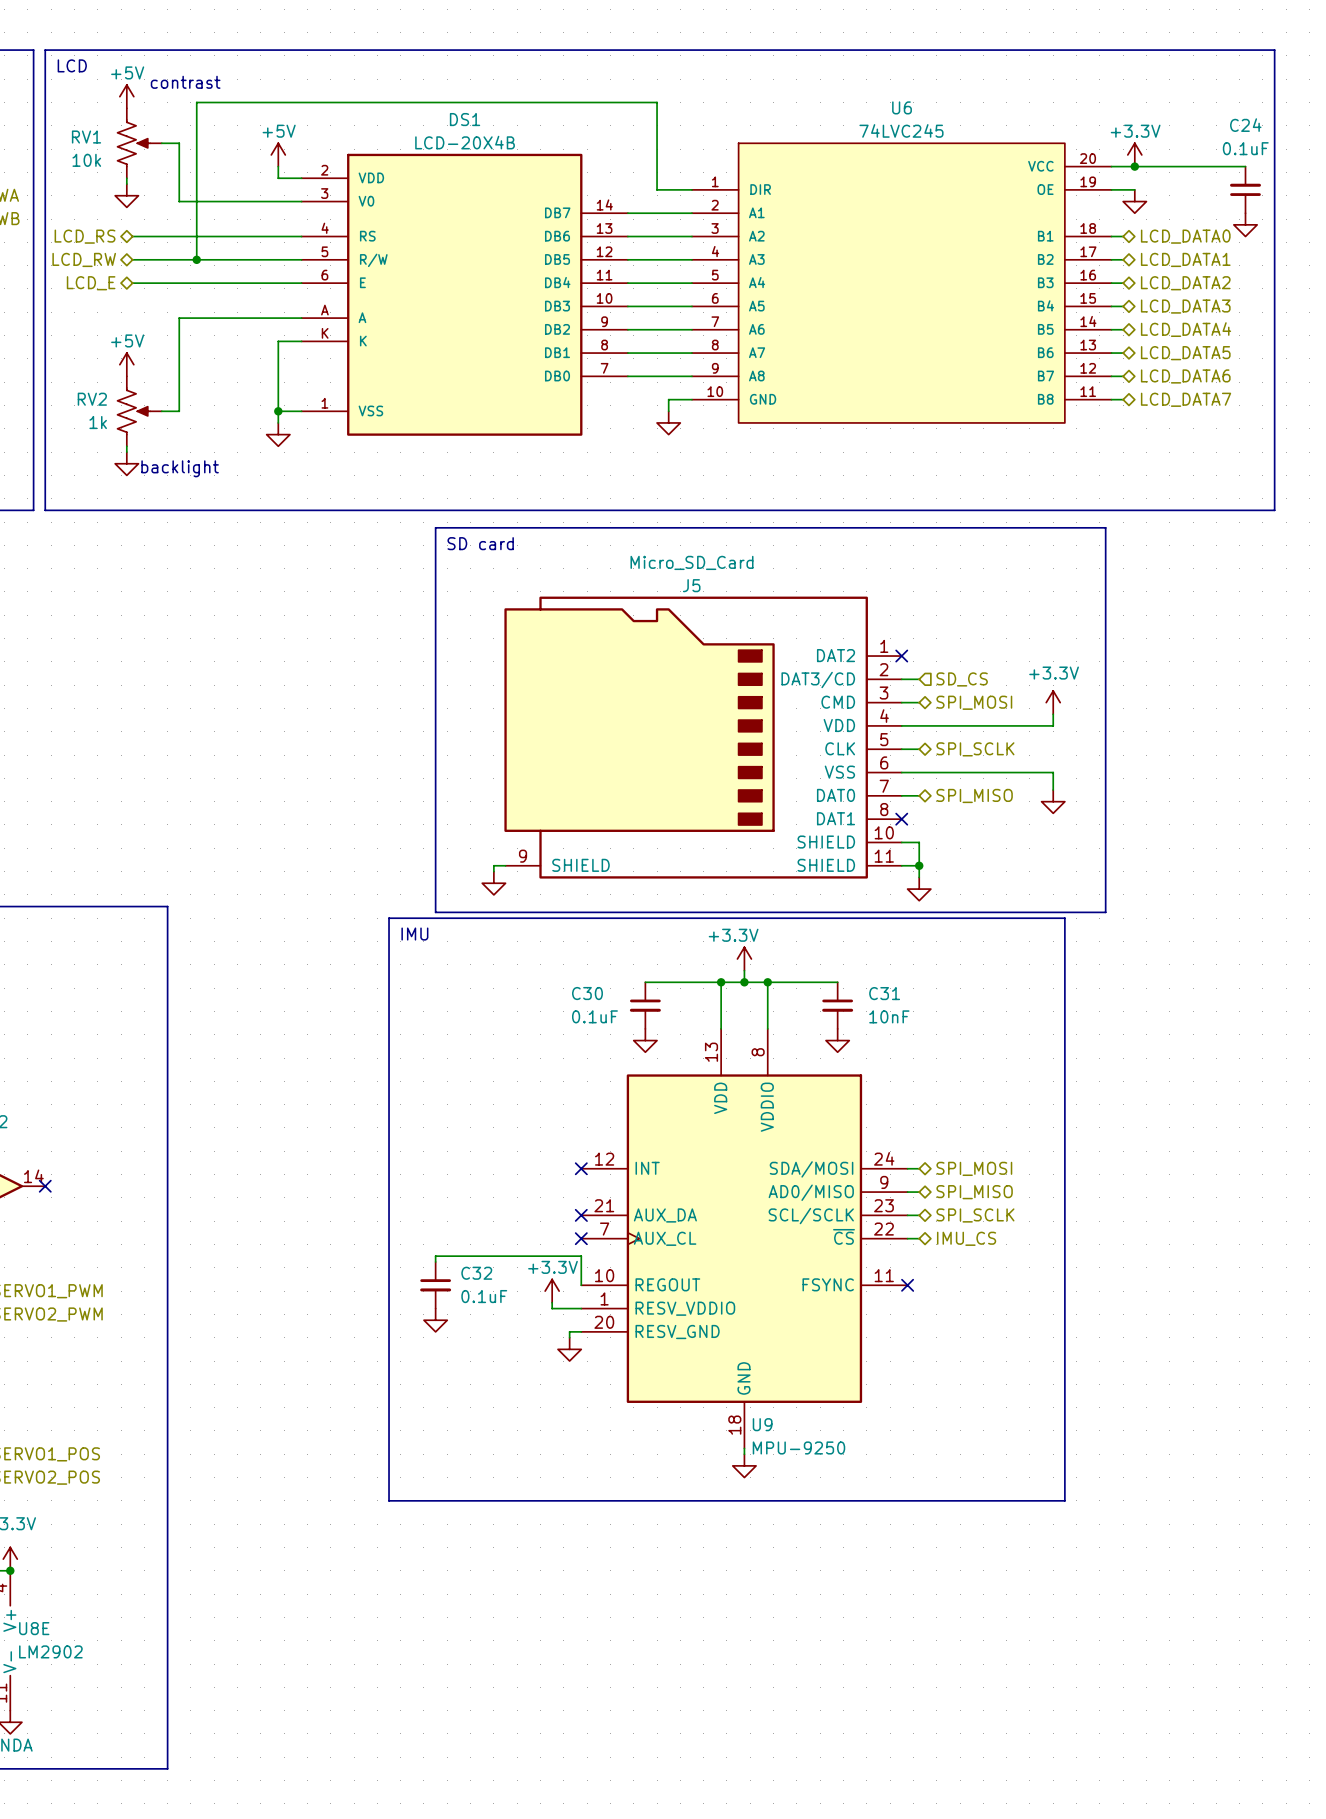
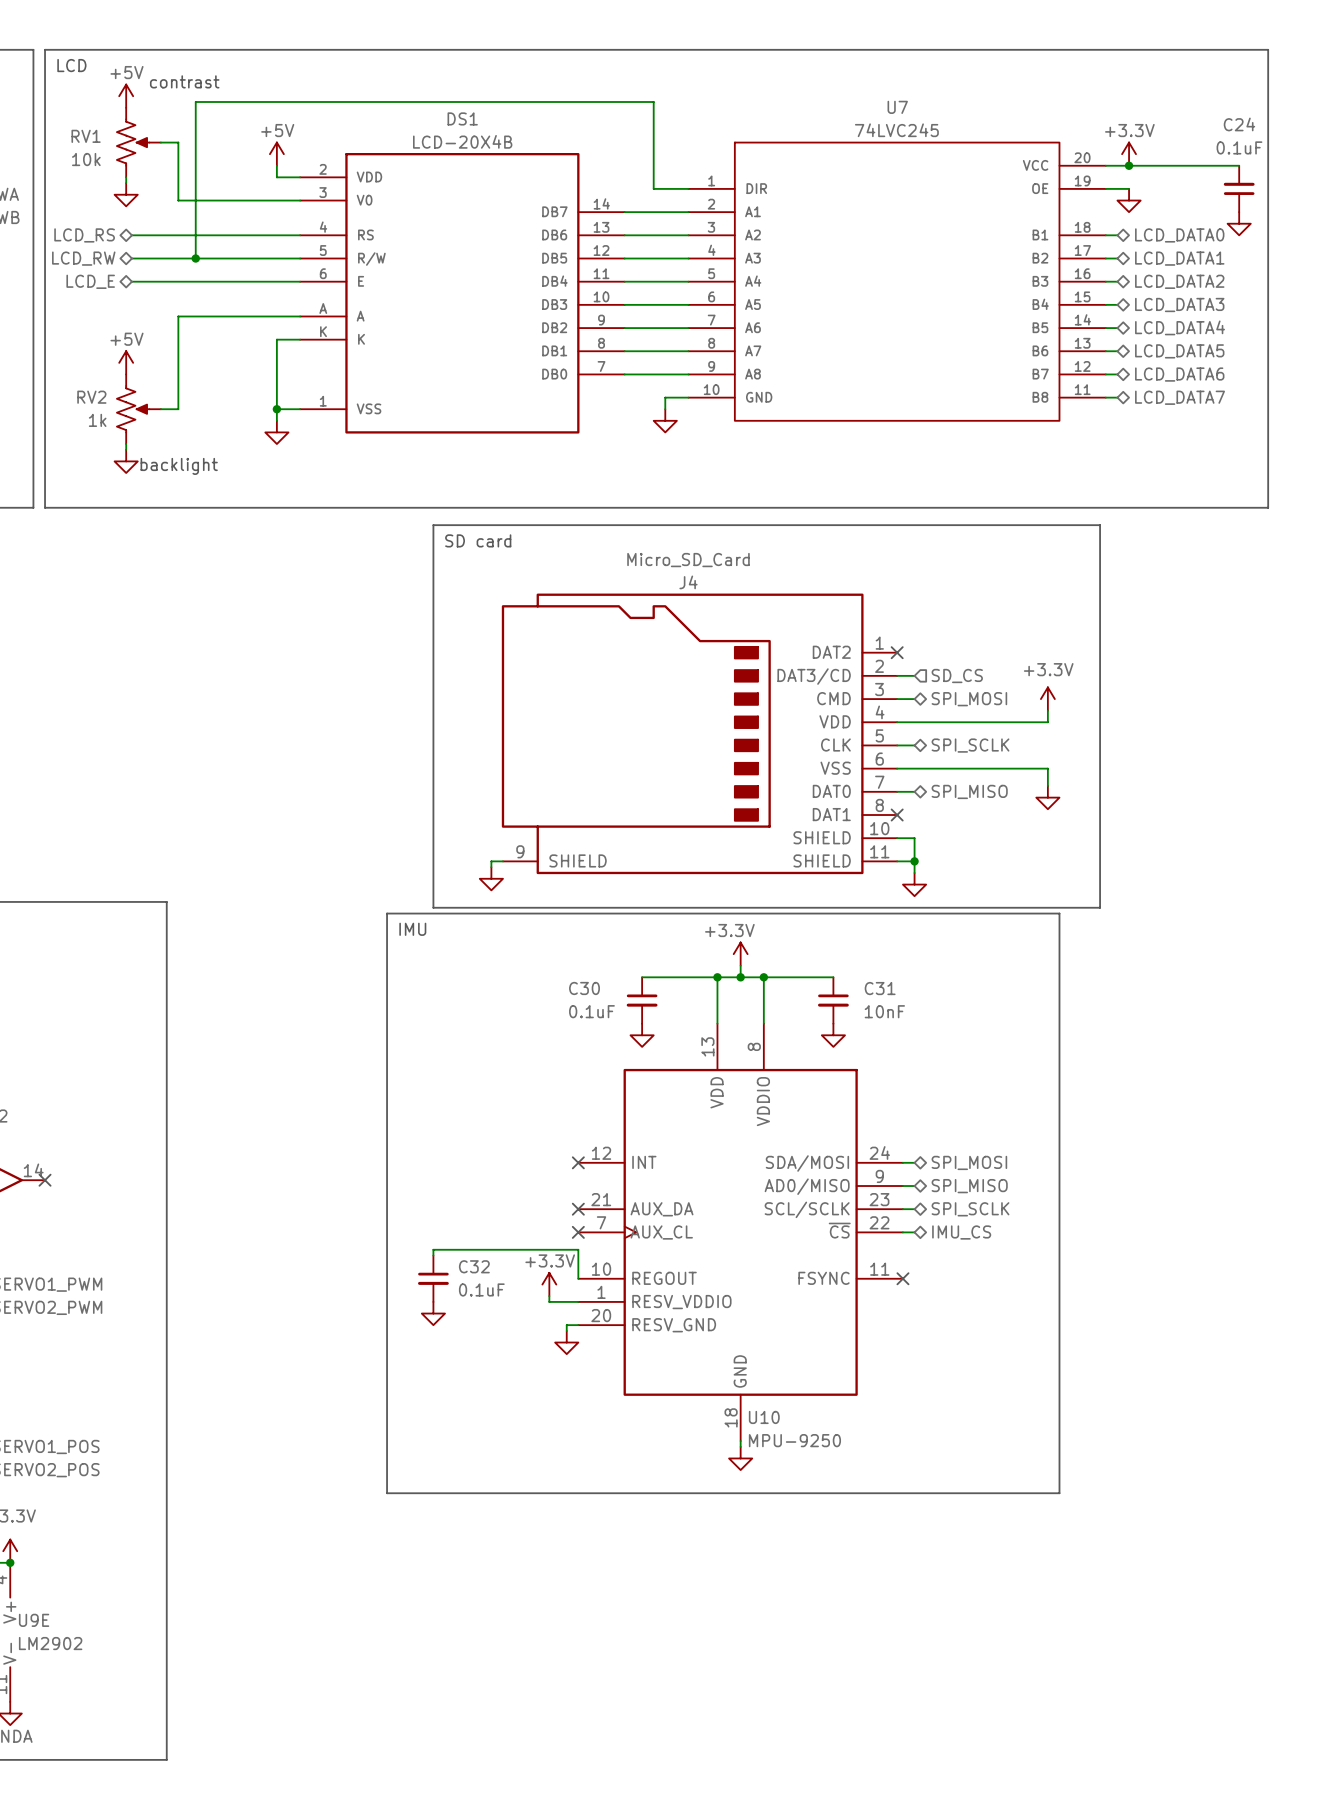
U6 name: U6 (902, 107) -> U7 (897, 107)
J5 name: J5 (691, 585) -> J4 (688, 582)
U9 name: U9 (762, 1424) -> U10 (764, 1417)
U8E name: U8E (34, 1628) -> U9E (34, 1620)

